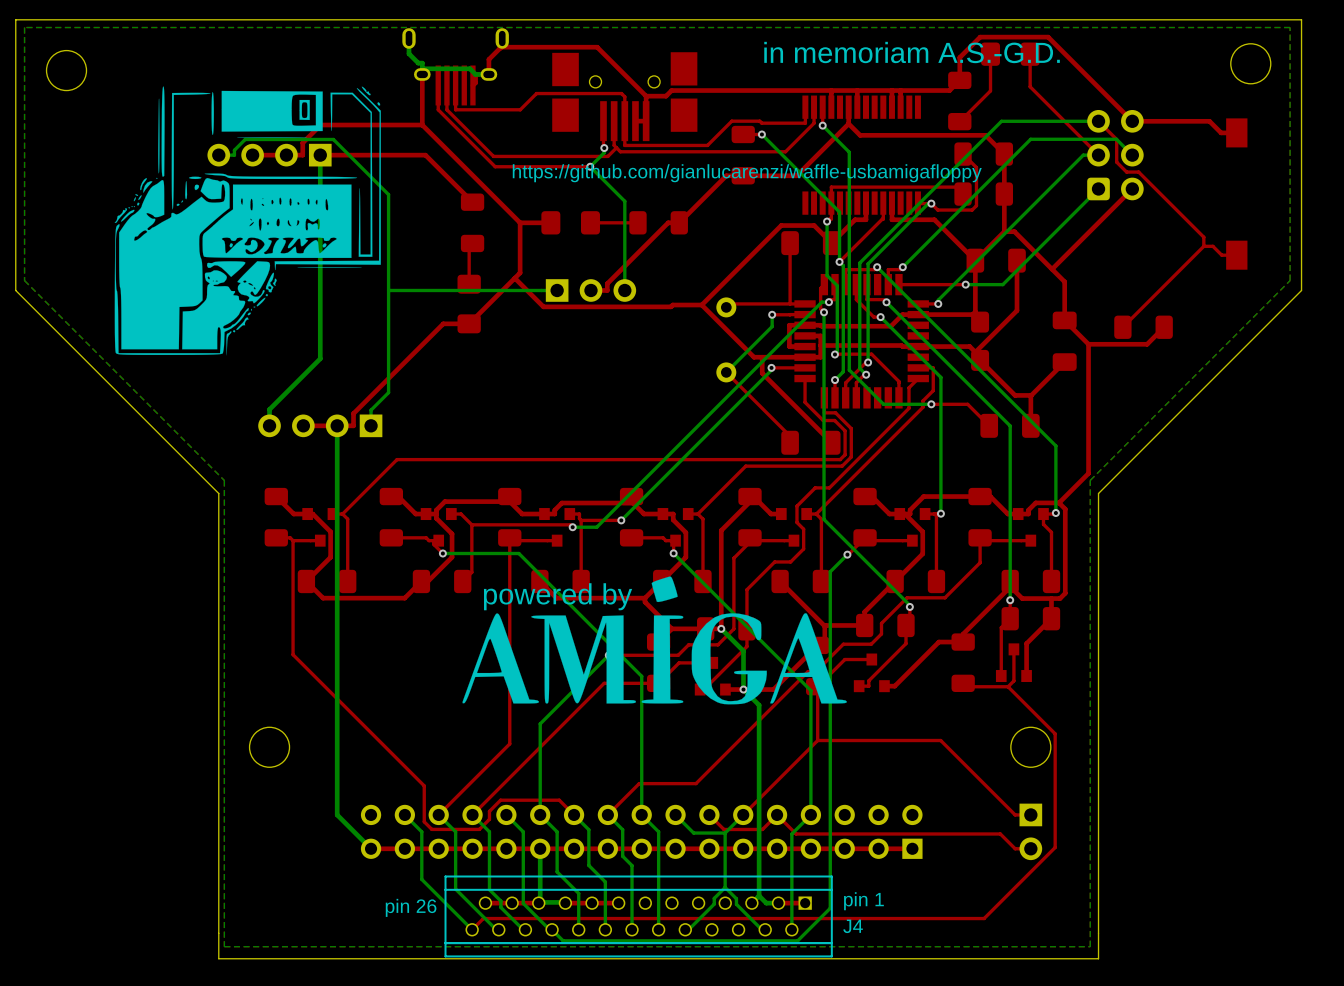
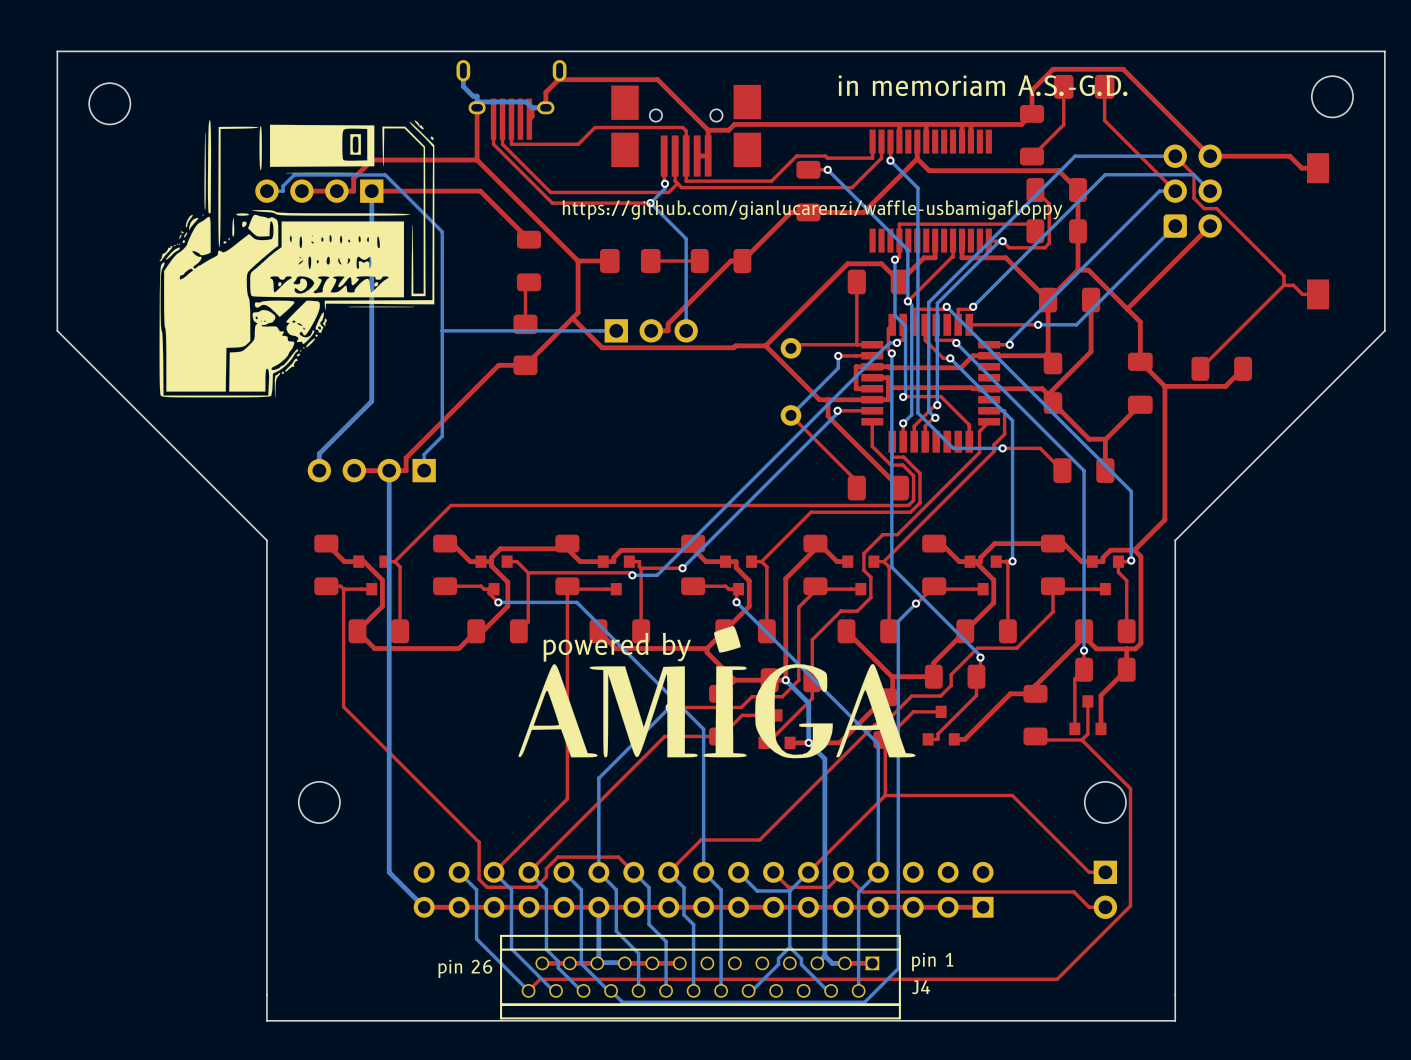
bottom zone outline: (1290, 27) (1290, 280) (1090, 480) (1090, 946) (224, 946) (224, 480) (24, 280) (24, 27) (1290, 27) -> none

